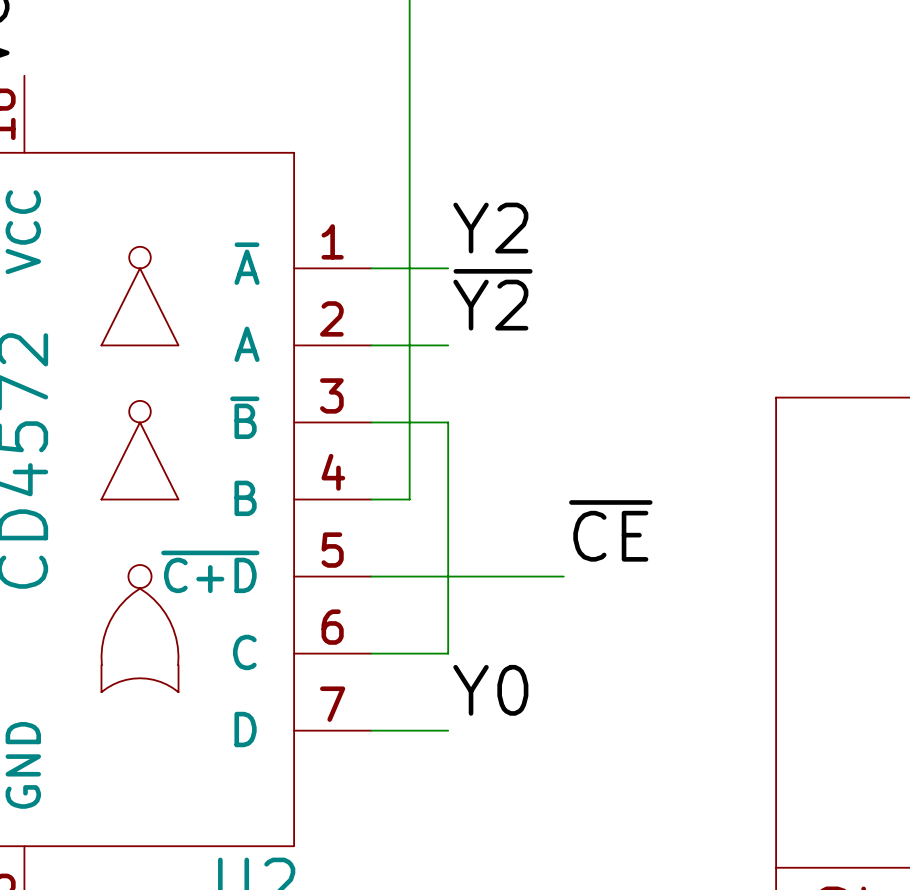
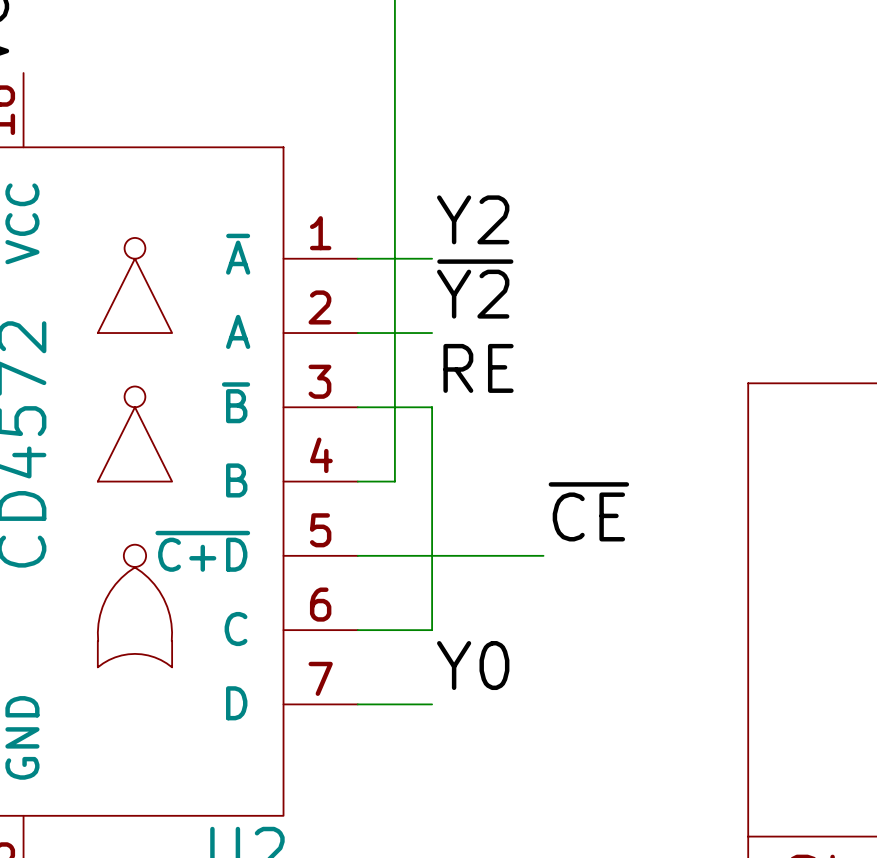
label: none -> RE (478, 368)

